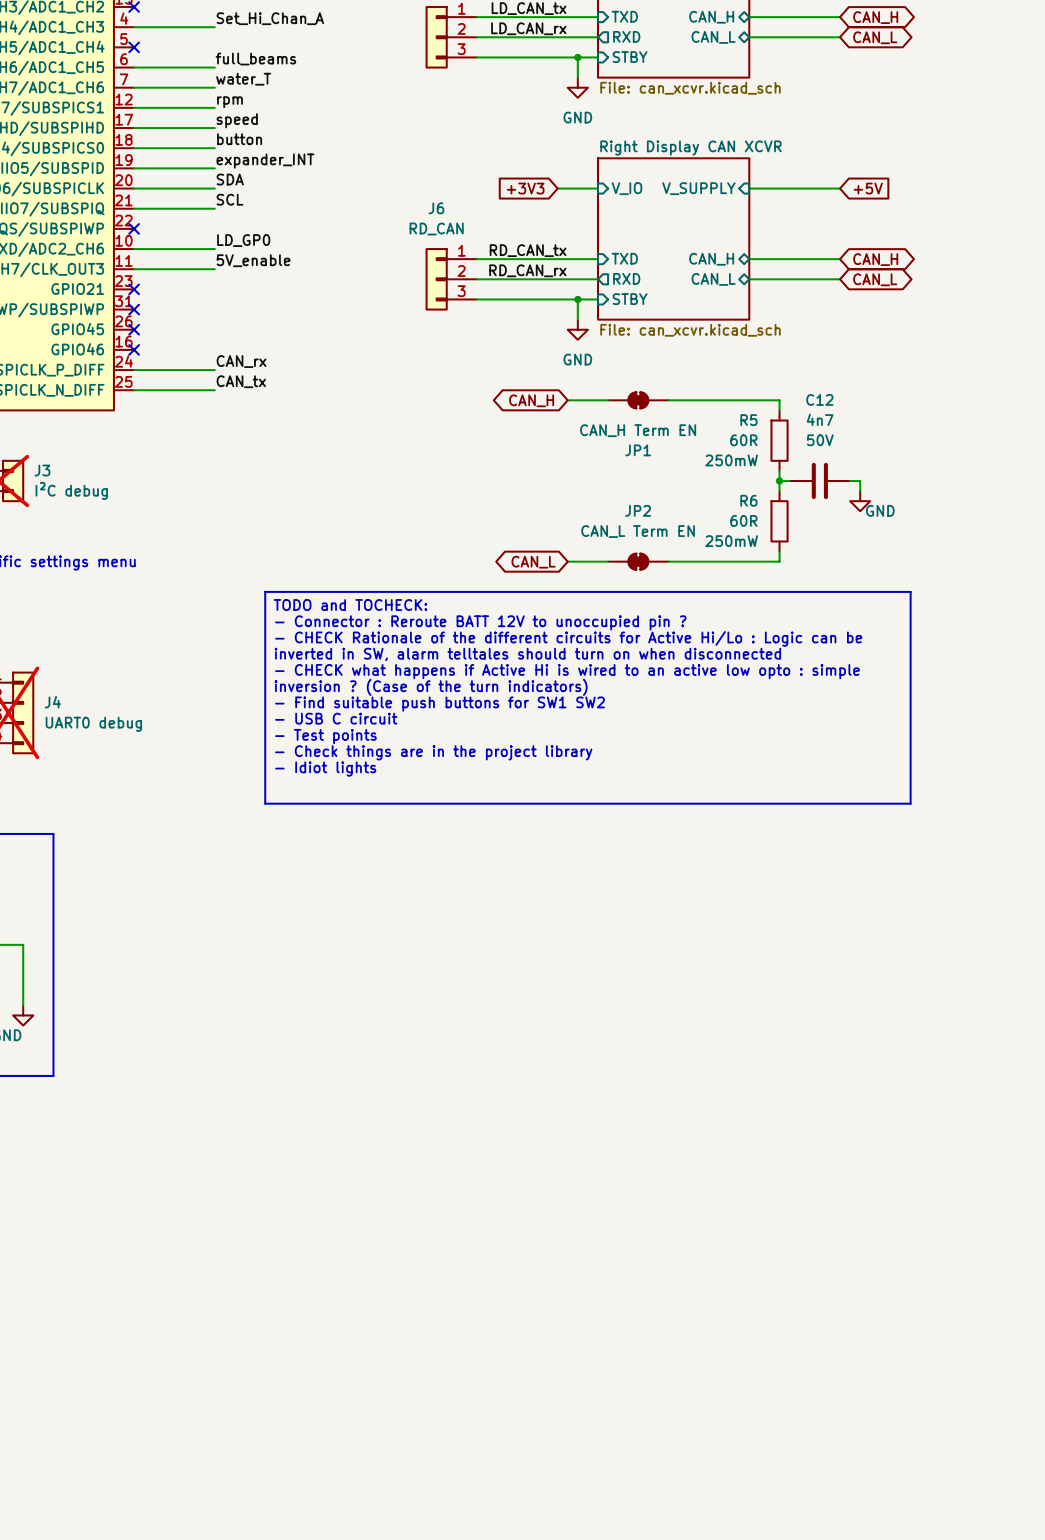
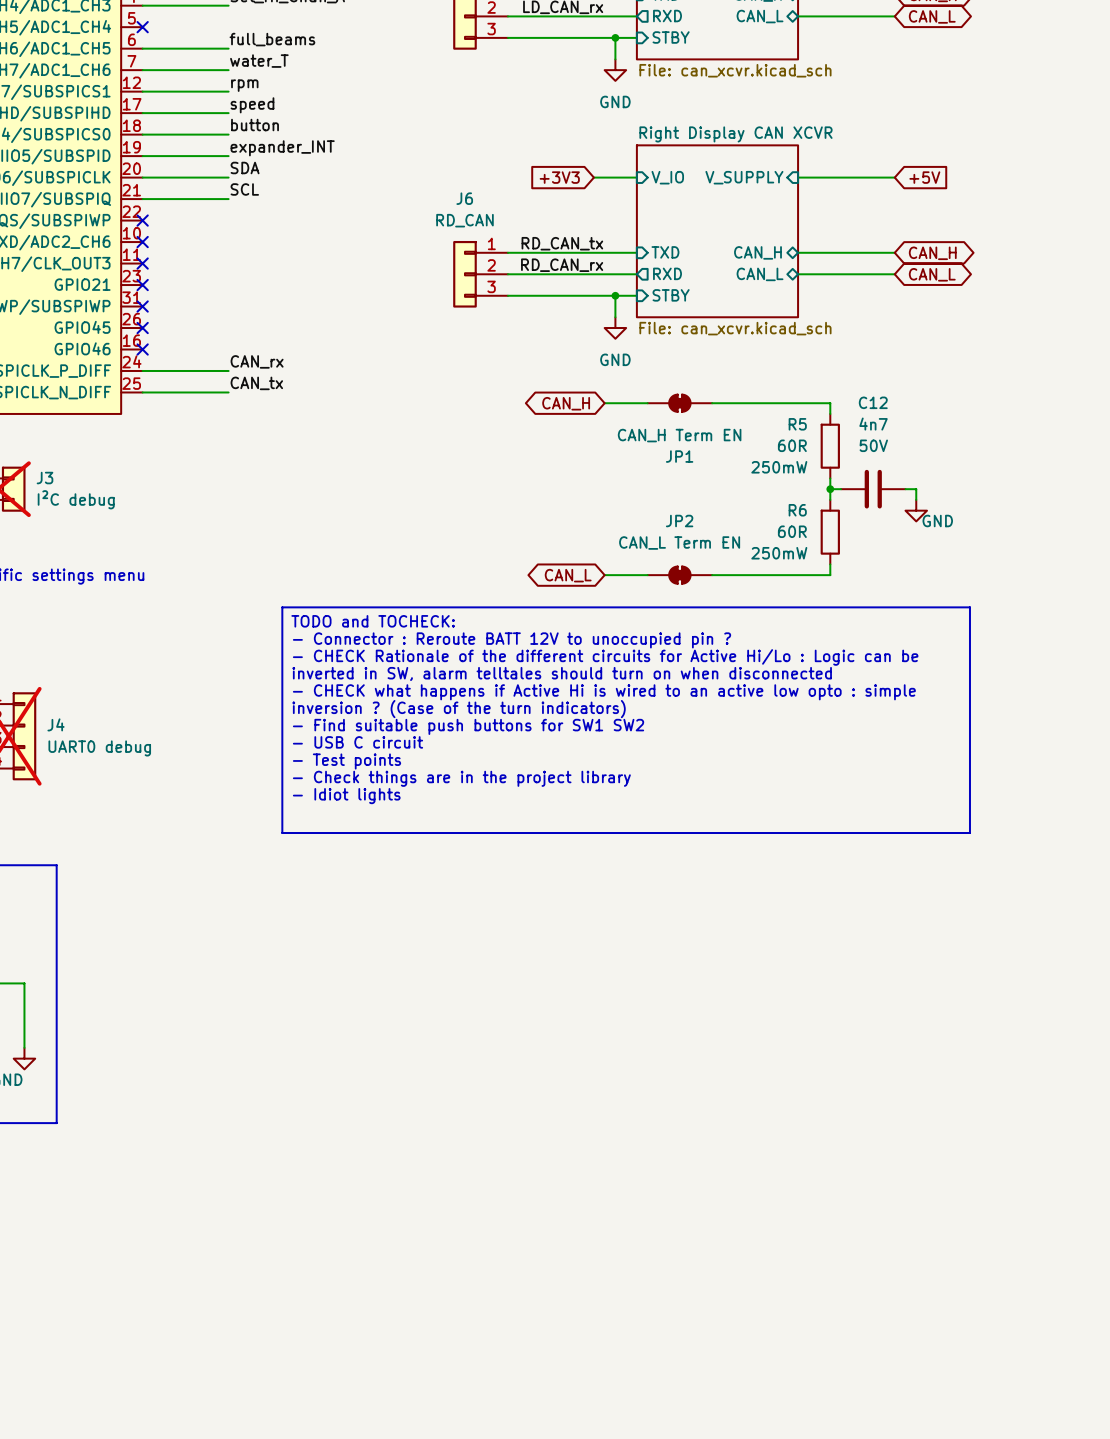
label: LD_GP0 (243, 240) -> none
wire: (134, 249) (214, 249) -> none
no-connect mark: none -> (142, 242)
label: 5V_enable (253, 260) -> none
wire: (134, 269) (214, 269) -> none
no-connect mark: none -> (142, 263)

